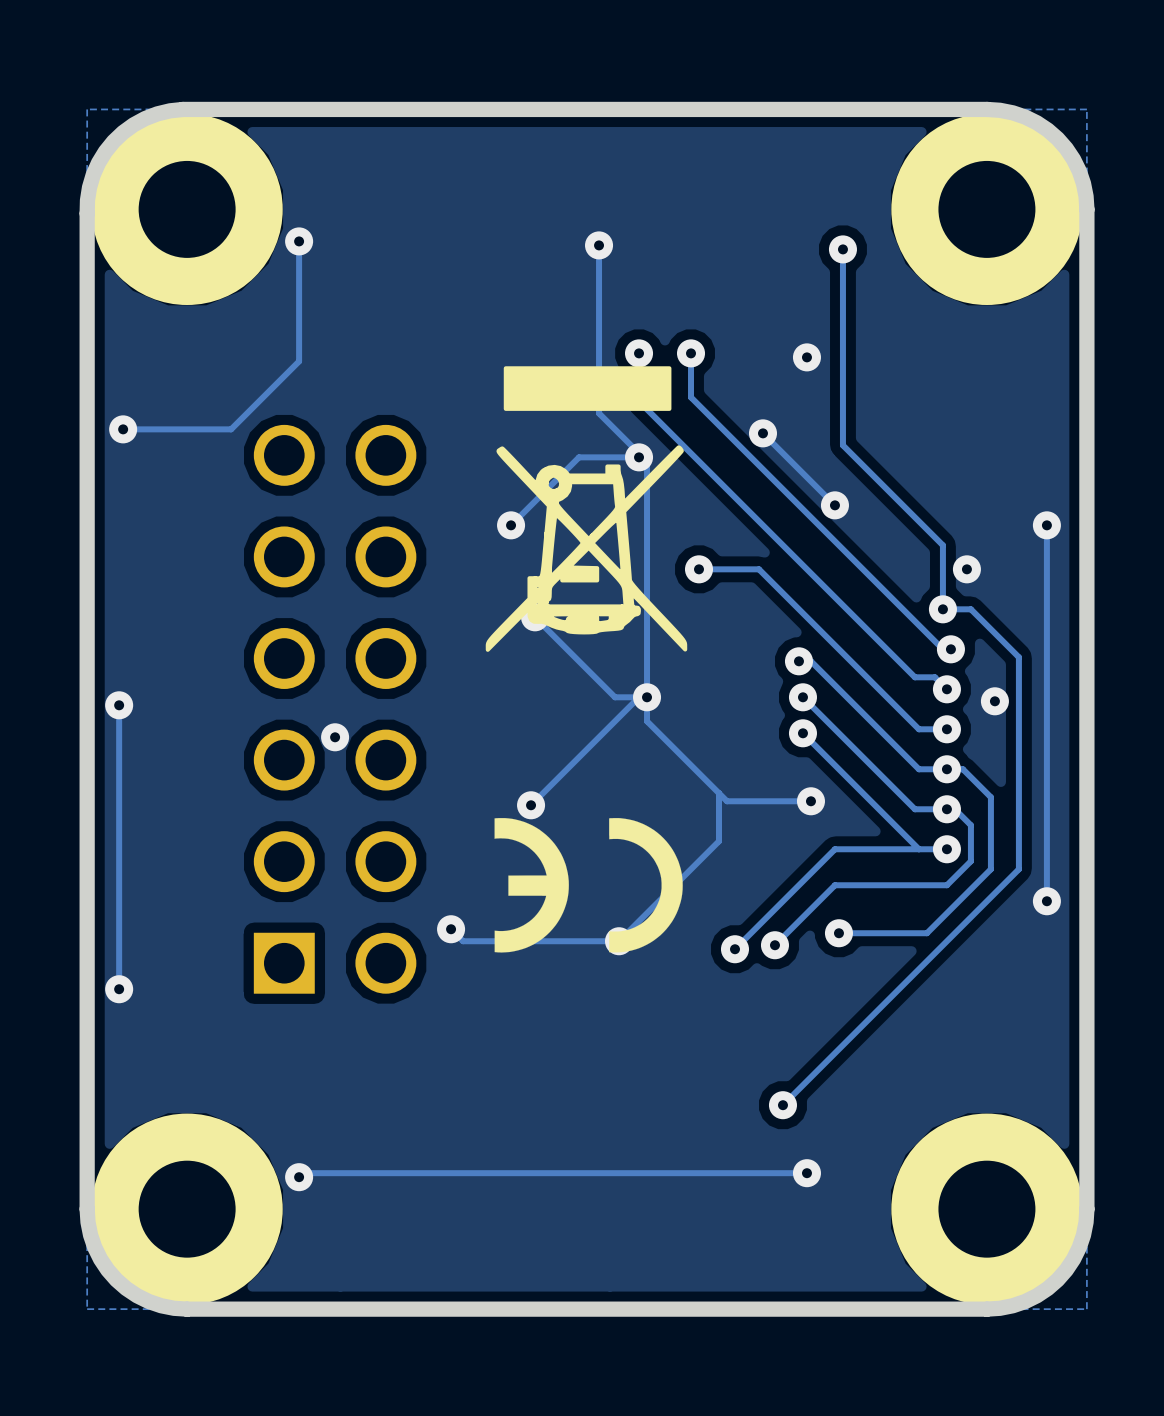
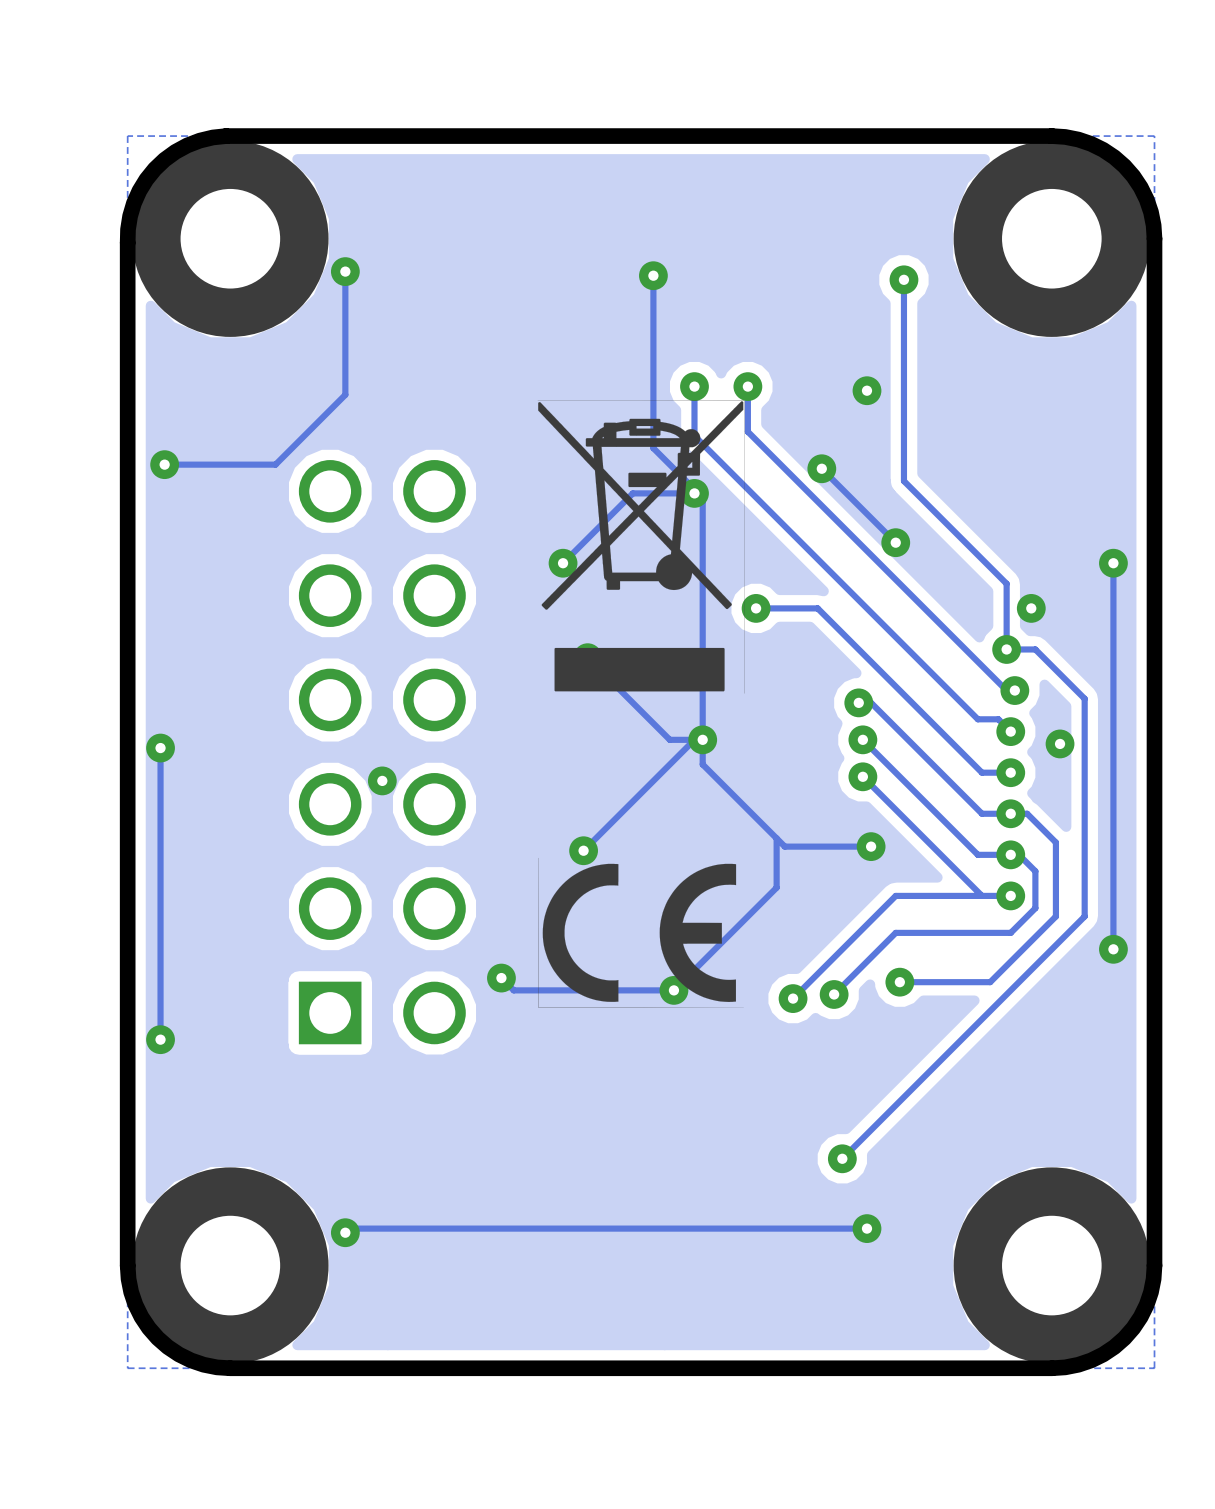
drawing shape: [485, 366, 688, 652] -> [537, 400, 745, 694]
drawing shape: [494, 818, 683, 953] -> [538, 857, 744, 1008]

